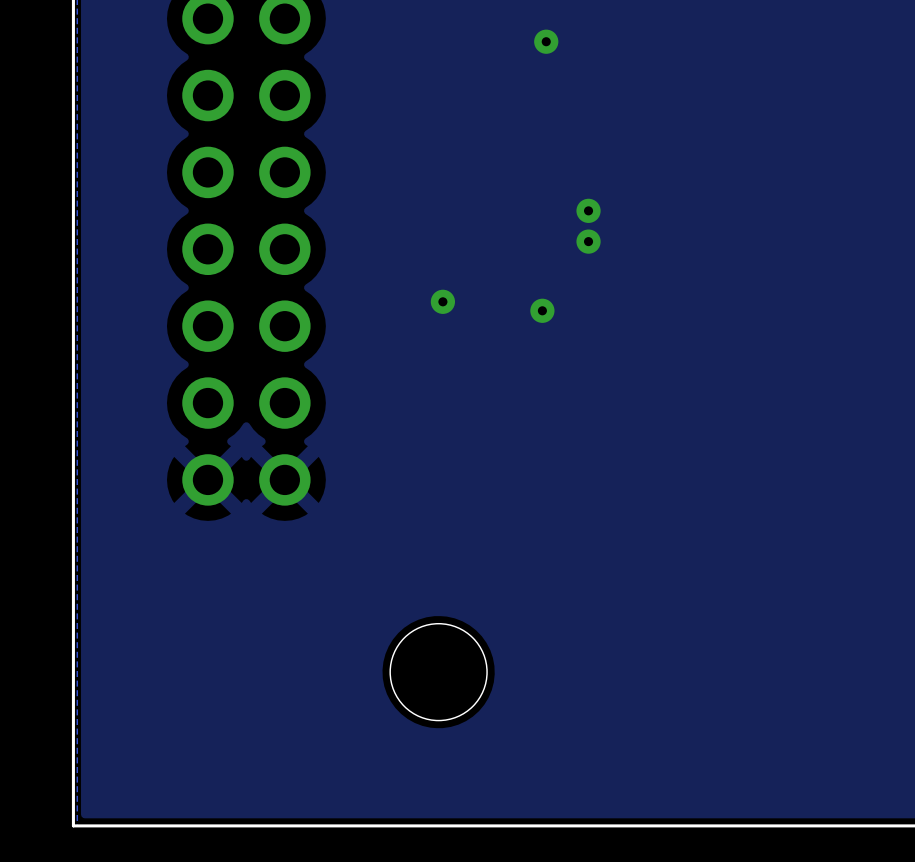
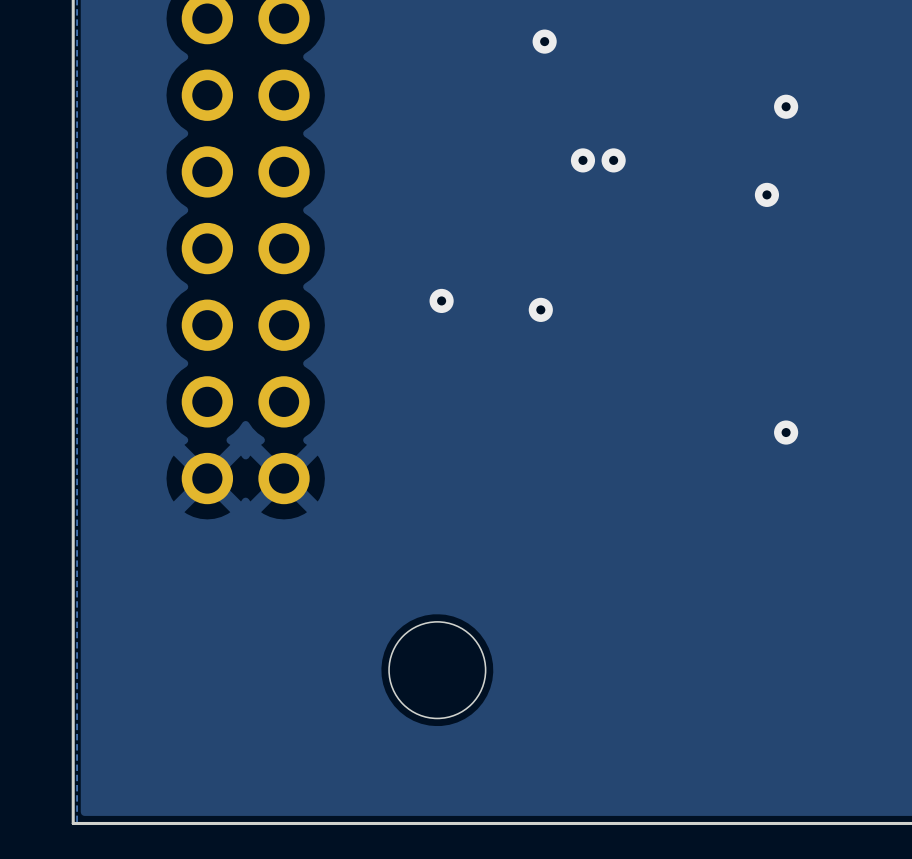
via: none -> (786, 106)
via: none -> (582, 160)
via: none -> (613, 160)
via: none -> (766, 194)
via: (588, 210) -> none
via: (588, 241) -> none
via: none -> (786, 432)

